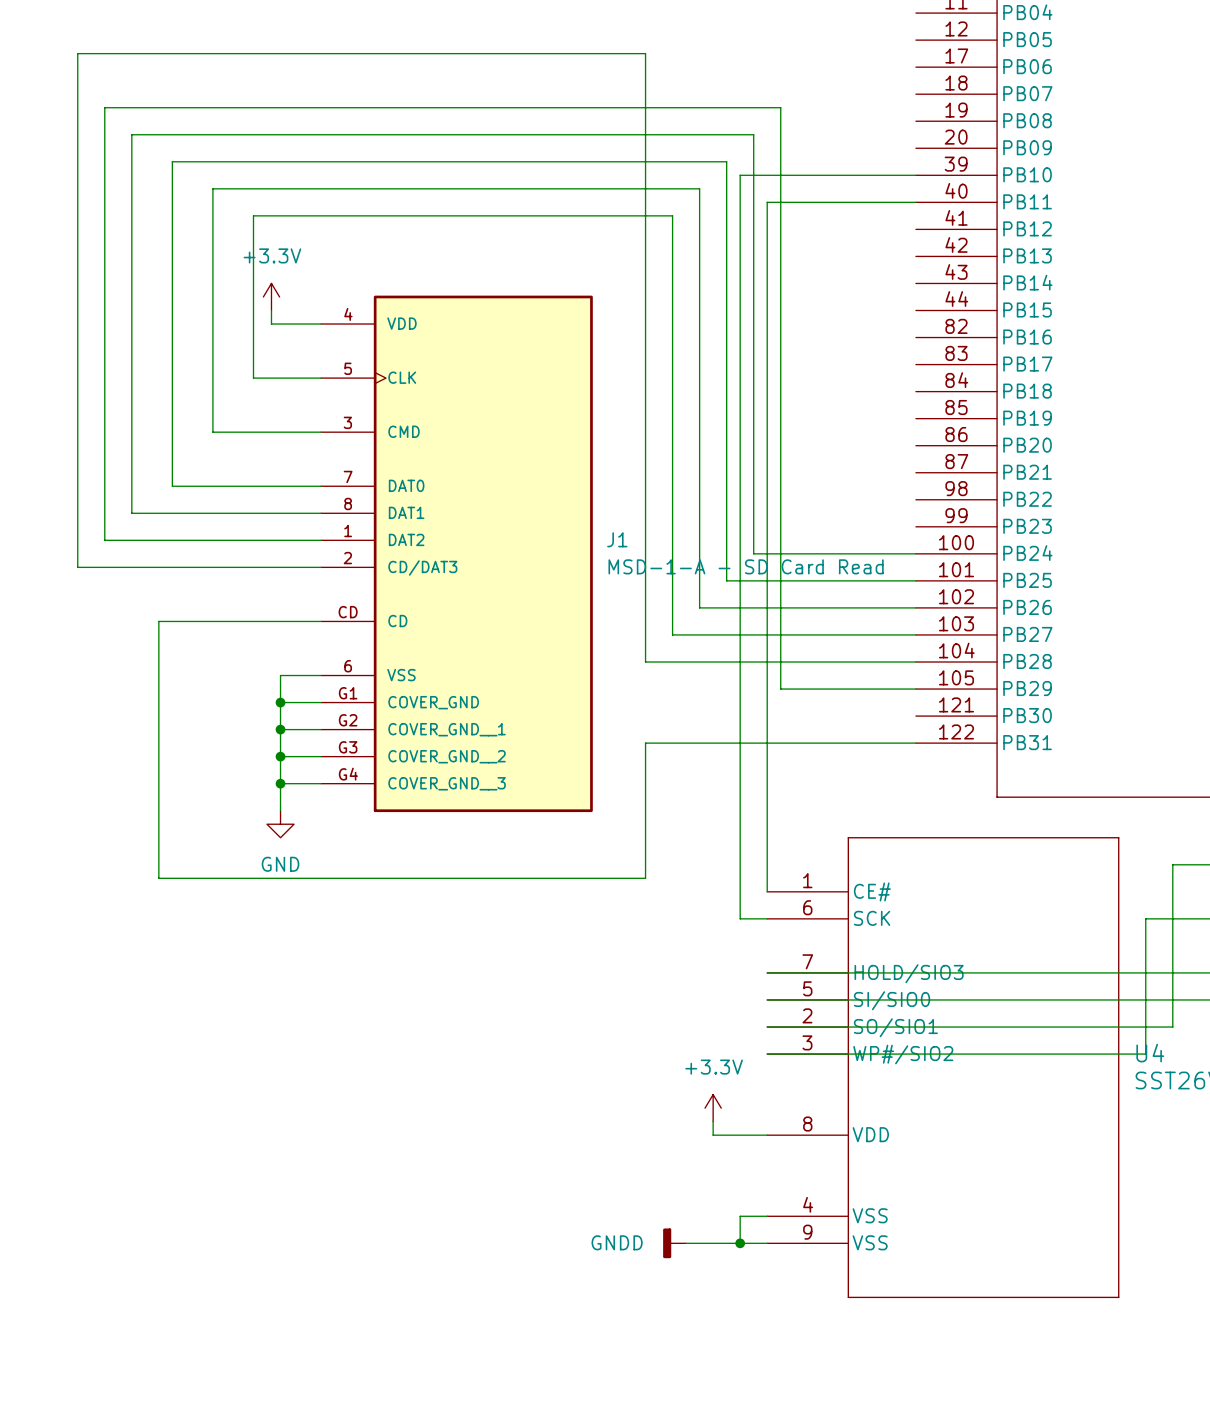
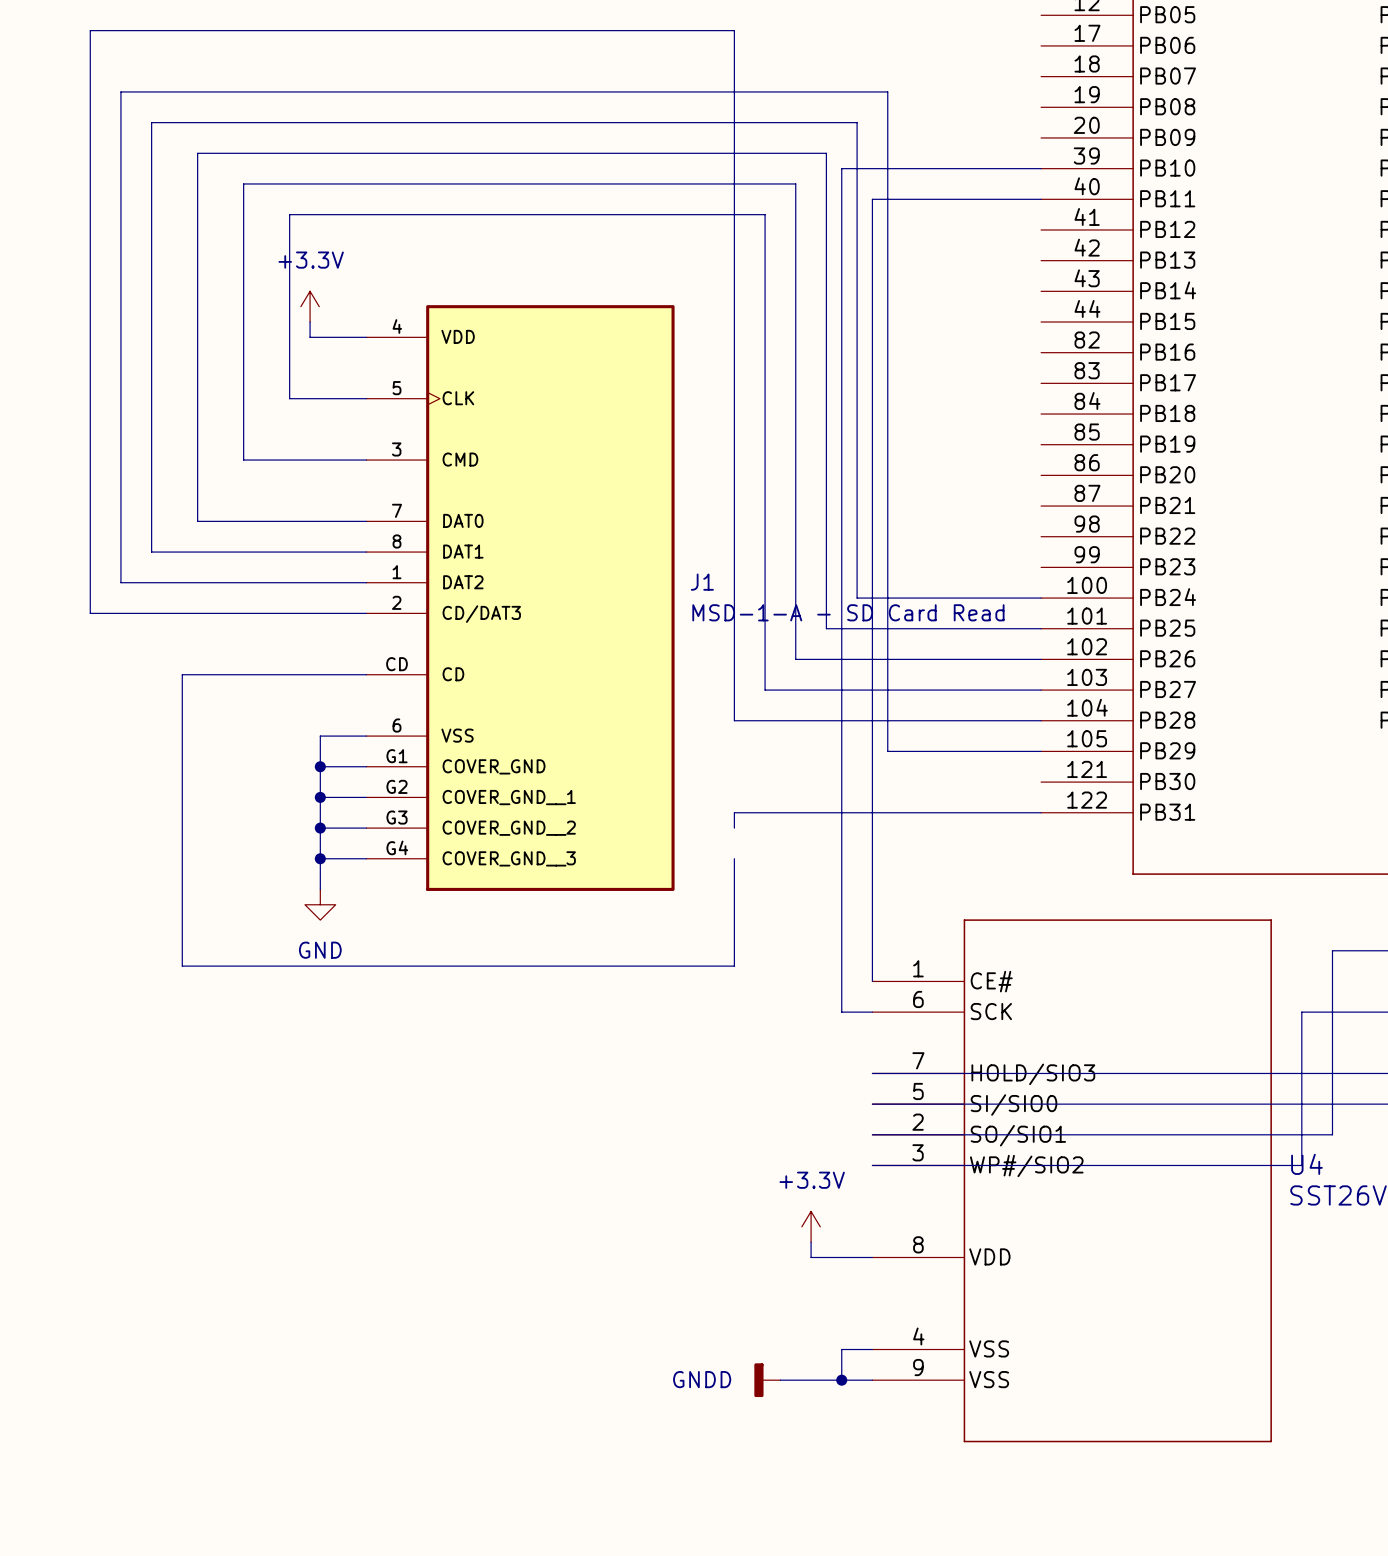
wire: (645, 756) (645, 783) -> none

